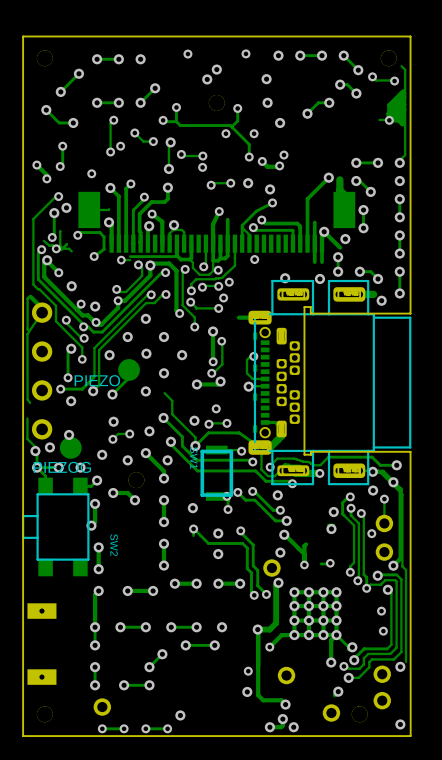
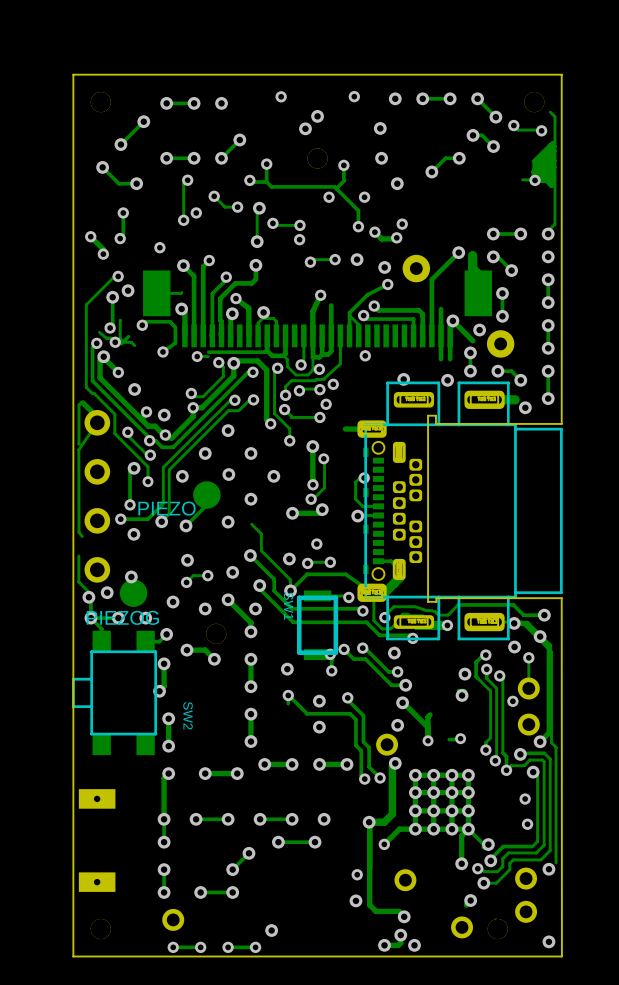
part: none -> (416, 268)
part: none -> (500, 343)

